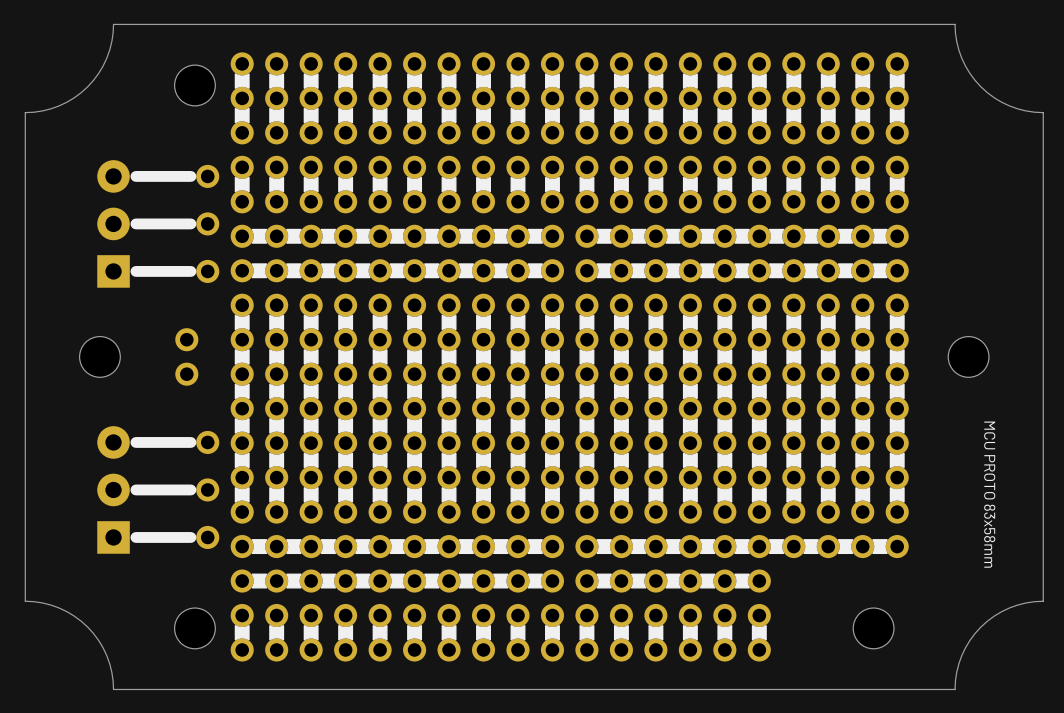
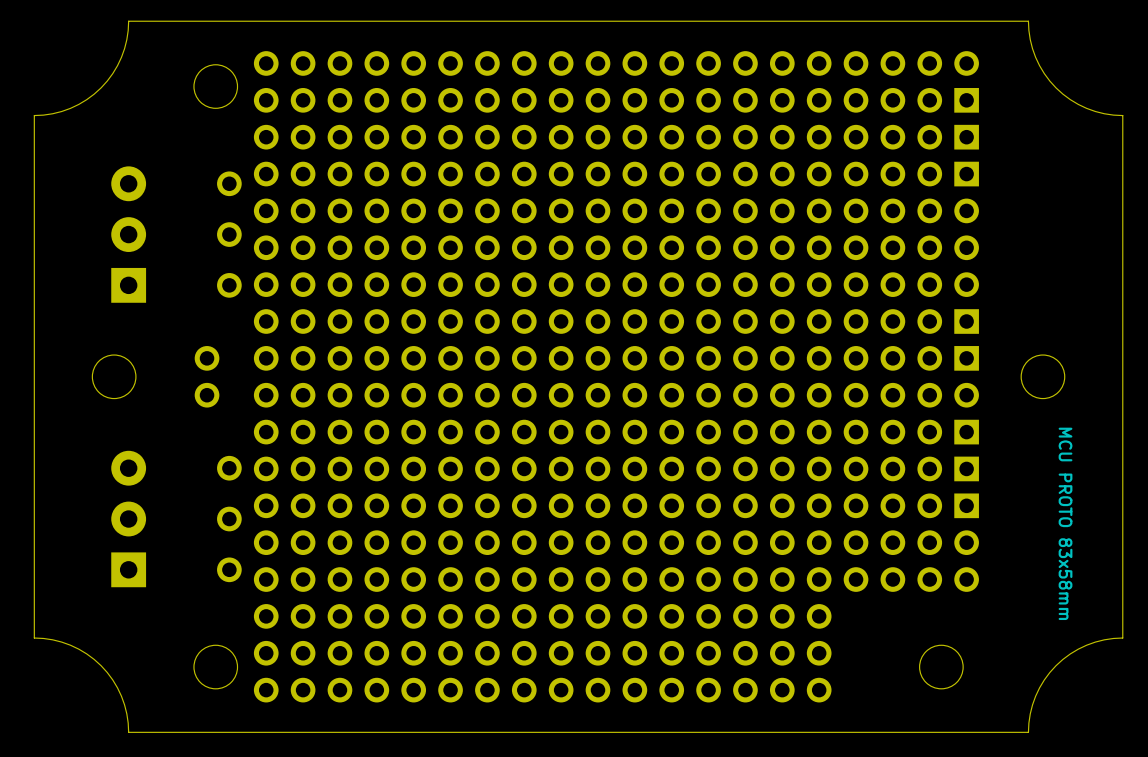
drawing: [234, 73, 250, 89] -> none
drawing: [269, 73, 285, 89] -> none
drawing: [303, 73, 319, 89] -> none
drawing: [338, 73, 354, 89] -> none
drawing: [372, 73, 388, 89] -> none
drawing: [407, 73, 423, 89] -> none
drawing: [441, 73, 457, 89] -> none
drawing: [476, 73, 491, 89] -> none
drawing: [510, 73, 526, 89] -> none
drawing: [545, 73, 560, 89] -> none
drawing: [579, 73, 595, 89] -> none
drawing: [613, 73, 629, 89] -> none
drawing: [648, 73, 664, 89] -> none
drawing: [682, 73, 698, 89] -> none
drawing: [717, 73, 733, 89] -> none
drawing: [751, 73, 767, 89] -> none
drawing: [786, 73, 802, 89] -> none
drawing: [820, 73, 836, 89] -> none
drawing: [855, 73, 871, 89] -> none
drawing: [889, 73, 905, 89] -> none
part: (242, 98) -> none
part: (276, 98) -> none
part: (311, 98) -> none
part: (345, 98) -> none
part: (380, 98) -> none
part: (414, 98) -> none
part: (449, 98) -> none
part: (483, 98) -> none
part: (518, 98) -> none
part: (552, 98) -> none
part: none -> (616, 100)
part: (586, 98) -> none
part: (621, 98) -> none
part: (655, 98) -> none
part: (690, 98) -> none
part: (724, 98) -> none
part: (759, 98) -> none
part: (793, 98) -> none
part: (828, 98) -> none
part: (862, 98) -> none
part: (897, 98) -> none
drawing: [234, 107, 250, 124] -> none
drawing: [269, 107, 285, 124] -> none
drawing: [303, 107, 319, 124] -> none
drawing: [338, 107, 354, 124] -> none
drawing: [372, 107, 388, 124] -> none
drawing: [407, 107, 423, 124] -> none
drawing: [441, 107, 457, 124] -> none
drawing: [476, 107, 491, 124] -> none
drawing: [510, 107, 526, 124] -> none
drawing: [545, 107, 560, 124] -> none
drawing: [579, 107, 595, 124] -> none
drawing: [613, 107, 629, 124] -> none
drawing: [648, 107, 664, 124] -> none
drawing: [682, 107, 698, 124] -> none
drawing: [717, 107, 733, 124] -> none
drawing: [751, 107, 767, 124] -> none
drawing: [786, 107, 802, 124] -> none
drawing: [820, 107, 836, 124] -> none
drawing: [855, 107, 871, 124] -> none
drawing: [889, 107, 905, 124] -> none
part: (242, 132) -> none
part: (276, 132) -> none
part: (311, 132) -> none
part: (345, 132) -> none
part: (380, 132) -> none
part: (414, 132) -> none
part: (449, 132) -> none
part: (483, 132) -> none
part: (518, 132) -> none
part: (552, 132) -> none
part: none -> (616, 137)
part: (586, 132) -> none
part: (621, 132) -> none
part: (655, 132) -> none
part: (690, 132) -> none
part: (724, 132) -> none
part: (759, 132) -> none
part: (793, 132) -> none
part: (828, 132) -> none
part: (862, 132) -> none
part: (897, 132) -> none
part: (242, 167) -> none
part: (276, 167) -> none
part: (311, 167) -> none
part: (345, 167) -> none
part: (380, 167) -> none
part: (414, 167) -> none
part: (449, 167) -> none
part: (483, 167) -> none
part: (518, 167) -> none
part: (552, 167) -> none
part: none -> (616, 174)
part: (586, 167) -> none
part: (621, 167) -> none
part: (655, 167) -> none
part: (690, 167) -> none
part: (724, 167) -> none
part: (759, 167) -> none
part: (793, 167) -> none
part: (828, 167) -> none
part: (862, 167) -> none
part: (897, 167) -> none
line: (190, 176) (135, 176) -> none
drawing: [234, 176, 250, 193] -> none
drawing: [269, 176, 285, 193] -> none
drawing: [303, 176, 319, 193] -> none
drawing: [338, 176, 354, 193] -> none
drawing: [372, 176, 388, 193] -> none
drawing: [407, 176, 423, 193] -> none
drawing: [441, 176, 457, 193] -> none
drawing: [476, 176, 491, 193] -> none
drawing: [510, 176, 526, 193] -> none
drawing: [545, 176, 560, 193] -> none
drawing: [579, 176, 595, 193] -> none
drawing: [613, 176, 629, 193] -> none
drawing: [648, 176, 664, 193] -> none
drawing: [682, 176, 698, 193] -> none
drawing: [717, 176, 733, 193] -> none
drawing: [751, 176, 767, 193] -> none
drawing: [786, 176, 802, 193] -> none
drawing: [820, 176, 836, 193] -> none
drawing: [855, 176, 871, 193] -> none
drawing: [889, 176, 905, 193] -> none
line: (190, 223) (135, 223) -> none
drawing: [251, 228, 268, 244] -> none
drawing: [286, 228, 302, 244] -> none
drawing: [320, 228, 337, 244] -> none
drawing: [355, 228, 371, 244] -> none
drawing: [389, 228, 406, 244] -> none
drawing: [424, 228, 440, 244] -> none
drawing: [458, 228, 475, 244] -> none
drawing: [493, 228, 509, 244] -> none
drawing: [527, 228, 543, 244] -> none
drawing: [596, 228, 612, 244] -> none
drawing: [630, 228, 647, 244] -> none
drawing: [665, 228, 681, 244] -> none
drawing: [699, 228, 716, 244] -> none
drawing: [734, 228, 750, 244] -> none
drawing: [768, 228, 785, 244] -> none
drawing: [803, 228, 819, 244] -> none
drawing: [837, 228, 854, 244] -> none
drawing: [872, 228, 888, 244] -> none
drawing: [251, 263, 268, 279] -> none
drawing: [286, 263, 302, 279] -> none
drawing: [320, 263, 337, 279] -> none
drawing: [355, 263, 371, 279] -> none
drawing: [389, 263, 406, 279] -> none
drawing: [424, 263, 440, 279] -> none
drawing: [458, 263, 475, 279] -> none
drawing: [493, 263, 509, 279] -> none
drawing: [527, 263, 543, 279] -> none
drawing: [596, 263, 612, 279] -> none
drawing: [630, 263, 647, 279] -> none
drawing: [665, 263, 681, 279] -> none
drawing: [699, 263, 716, 279] -> none
drawing: [734, 263, 750, 279] -> none
drawing: [768, 263, 785, 279] -> none
drawing: [803, 263, 819, 279] -> none
drawing: [837, 263, 854, 279] -> none
drawing: [872, 263, 888, 279] -> none
line: (190, 271) (135, 271) -> none
part: (242, 305) -> none
part: (276, 305) -> none
part: (311, 305) -> none
part: (345, 305) -> none
part: (380, 305) -> none
part: (414, 305) -> none
part: (449, 305) -> none
part: (483, 305) -> none
part: (518, 305) -> none
part: (552, 305) -> none
part: none -> (616, 321)
part: (586, 305) -> none
part: (621, 305) -> none
part: (655, 305) -> none
part: (690, 305) -> none
part: (724, 305) -> none
part: (759, 305) -> none
part: (793, 305) -> none
part: (828, 305) -> none
part: (862, 305) -> none
part: (897, 305) -> none
drawing: [234, 314, 250, 331] -> none
drawing: [269, 314, 285, 331] -> none
drawing: [303, 314, 319, 331] -> none
drawing: [338, 314, 354, 331] -> none
drawing: [372, 314, 388, 331] -> none
drawing: [407, 314, 423, 331] -> none
drawing: [441, 314, 457, 331] -> none
drawing: [476, 314, 491, 331] -> none
drawing: [510, 314, 526, 331] -> none
drawing: [545, 314, 560, 331] -> none
drawing: [579, 314, 595, 331] -> none
drawing: [613, 314, 629, 331] -> none
drawing: [648, 314, 664, 331] -> none
drawing: [682, 314, 698, 331] -> none
drawing: [717, 314, 733, 331] -> none
drawing: [751, 314, 767, 331] -> none
drawing: [786, 314, 802, 331] -> none
drawing: [820, 314, 836, 331] -> none
drawing: [855, 314, 871, 331] -> none
drawing: [889, 314, 905, 331] -> none
part: (242, 339) -> none
part: (276, 339) -> none
part: (311, 339) -> none
part: (345, 339) -> none
part: (380, 339) -> none
part: (414, 339) -> none
part: (449, 339) -> none
part: (483, 339) -> none
part: (518, 339) -> none
part: (552, 339) -> none
part: none -> (616, 358)
part: (586, 339) -> none
part: (621, 339) -> none
part: (655, 339) -> none
part: (690, 339) -> none
part: (724, 339) -> none
part: (759, 339) -> none
part: (793, 339) -> none
part: (828, 339) -> none
part: (862, 339) -> none
part: (897, 339) -> none
drawing: [234, 349, 250, 365] -> none
drawing: [269, 349, 285, 365] -> none
drawing: [303, 349, 319, 365] -> none
drawing: [338, 349, 354, 365] -> none
drawing: [372, 349, 388, 365] -> none
drawing: [407, 349, 423, 365] -> none
drawing: [441, 349, 457, 365] -> none
drawing: [476, 349, 491, 365] -> none
drawing: [510, 349, 526, 365] -> none
drawing: [545, 349, 560, 365] -> none
drawing: [579, 349, 595, 365] -> none
drawing: [613, 349, 629, 365] -> none
drawing: [648, 349, 664, 365] -> none
drawing: [682, 349, 698, 365] -> none
drawing: [717, 349, 733, 365] -> none
drawing: [751, 349, 767, 365] -> none
drawing: [786, 349, 802, 365] -> none
drawing: [820, 349, 836, 365] -> none
drawing: [855, 349, 871, 365] -> none
drawing: [889, 349, 905, 365] -> none
drawing: [234, 383, 250, 400] -> none
drawing: [269, 383, 285, 400] -> none
drawing: [303, 383, 319, 400] -> none
drawing: [338, 383, 354, 400] -> none
drawing: [372, 383, 388, 400] -> none
drawing: [407, 383, 423, 400] -> none
drawing: [441, 383, 457, 400] -> none
drawing: [476, 383, 491, 400] -> none
drawing: [510, 383, 526, 400] -> none
drawing: [545, 383, 560, 400] -> none
drawing: [579, 383, 595, 400] -> none
drawing: [613, 383, 629, 400] -> none
drawing: [648, 383, 664, 400] -> none
drawing: [682, 383, 698, 400] -> none
drawing: [717, 383, 733, 400] -> none
drawing: [751, 383, 767, 400] -> none
drawing: [786, 383, 802, 400] -> none
drawing: [820, 383, 836, 400] -> none
drawing: [855, 383, 871, 400] -> none
drawing: [889, 383, 905, 400] -> none
part: (242, 408) -> none
part: (276, 408) -> none
part: (311, 408) -> none
part: (345, 408) -> none
part: (380, 408) -> none
part: (414, 408) -> none
part: (449, 408) -> none
part: (483, 408) -> none
part: (518, 408) -> none
part: (552, 408) -> none
part: none -> (616, 432)
part: (586, 408) -> none
part: (621, 408) -> none
part: (655, 408) -> none
part: (690, 408) -> none
part: (724, 408) -> none
part: (759, 408) -> none
part: (793, 408) -> none
part: (828, 408) -> none
part: (862, 408) -> none
part: (897, 408) -> none
drawing: [234, 418, 250, 434] -> none
drawing: [269, 418, 285, 434] -> none
drawing: [303, 418, 319, 434] -> none
drawing: [338, 418, 354, 434] -> none
drawing: [372, 418, 388, 434] -> none
drawing: [407, 418, 423, 434] -> none
drawing: [441, 418, 457, 434] -> none
drawing: [476, 418, 491, 434] -> none
drawing: [510, 418, 526, 434] -> none
drawing: [545, 418, 560, 434] -> none
drawing: [579, 418, 595, 434] -> none
drawing: [613, 418, 629, 434] -> none
drawing: [648, 418, 664, 434] -> none
drawing: [682, 418, 698, 434] -> none
drawing: [717, 418, 733, 434] -> none
drawing: [751, 418, 767, 434] -> none
drawing: [786, 418, 802, 434] -> none
drawing: [820, 418, 836, 434] -> none
drawing: [855, 418, 871, 434] -> none
drawing: [889, 418, 905, 434] -> none
line: (190, 442) (135, 442) -> none
part: (242, 443) -> none
part: (276, 443) -> none
part: (311, 443) -> none
part: (345, 443) -> none
part: (380, 443) -> none
part: (414, 443) -> none
part: (449, 443) -> none
part: (483, 443) -> none
part: (518, 443) -> none
part: (552, 443) -> none
part: none -> (616, 468)
part: (586, 443) -> none
part: (621, 443) -> none
part: (655, 443) -> none
part: (690, 443) -> none
part: (724, 443) -> none
part: (759, 443) -> none
part: (793, 443) -> none
part: (828, 443) -> none
part: (862, 443) -> none
part: (897, 443) -> none
drawing: [234, 452, 250, 469] -> none
drawing: [269, 452, 285, 469] -> none
drawing: [303, 452, 319, 469] -> none
drawing: [338, 452, 354, 469] -> none
drawing: [372, 452, 388, 469] -> none
drawing: [407, 452, 423, 469] -> none
drawing: [441, 452, 457, 469] -> none
drawing: [476, 452, 491, 469] -> none
drawing: [510, 452, 526, 469] -> none
drawing: [545, 452, 560, 469] -> none
drawing: [579, 452, 595, 469] -> none
drawing: [613, 452, 629, 469] -> none
drawing: [648, 452, 664, 469] -> none
drawing: [682, 452, 698, 469] -> none
drawing: [717, 452, 733, 469] -> none
drawing: [751, 452, 767, 469] -> none
drawing: [786, 452, 802, 469] -> none
drawing: [820, 452, 836, 469] -> none
drawing: [855, 452, 871, 469] -> none
drawing: [889, 452, 905, 469] -> none
part: (242, 477) -> none
part: (276, 477) -> none
part: (311, 477) -> none
part: (345, 477) -> none
part: (380, 477) -> none
part: (414, 477) -> none
part: (449, 477) -> none
part: (483, 477) -> none
part: (518, 477) -> none
part: (552, 477) -> none
part: none -> (616, 505)
part: (586, 477) -> none
part: (621, 477) -> none
part: (655, 477) -> none
part: (690, 477) -> none
part: (724, 477) -> none
part: (759, 477) -> none
part: (793, 477) -> none
part: (828, 477) -> none
part: (862, 477) -> none
part: (897, 477) -> none
drawing: [234, 487, 250, 503] -> none
drawing: [269, 487, 285, 503] -> none
drawing: [303, 487, 319, 503] -> none
drawing: [338, 487, 354, 503] -> none
drawing: [372, 487, 388, 503] -> none
drawing: [407, 487, 423, 503] -> none
drawing: [441, 487, 457, 503] -> none
drawing: [476, 487, 491, 503] -> none
drawing: [510, 487, 526, 503] -> none
drawing: [545, 487, 560, 503] -> none
drawing: [579, 487, 595, 503] -> none
drawing: [613, 487, 629, 503] -> none
drawing: [648, 487, 664, 503] -> none
drawing: [682, 487, 698, 503] -> none
drawing: [717, 487, 733, 503] -> none
drawing: [751, 487, 767, 503] -> none
drawing: [786, 487, 802, 503] -> none
drawing: [820, 487, 836, 503] -> none
drawing: [855, 487, 871, 503] -> none
drawing: [889, 487, 905, 503] -> none
line: (190, 489) (135, 489) -> none
line: (190, 537) (135, 537) -> none
drawing: [251, 539, 268, 555] -> none
drawing: [286, 539, 302, 555] -> none
drawing: [320, 539, 337, 555] -> none
drawing: [355, 539, 371, 555] -> none
drawing: [389, 539, 406, 555] -> none
drawing: [424, 539, 440, 555] -> none
drawing: [458, 539, 475, 555] -> none
drawing: [493, 539, 509, 555] -> none
drawing: [527, 539, 543, 555] -> none
drawing: [596, 539, 612, 555] -> none
drawing: [630, 539, 647, 555] -> none
drawing: [665, 539, 681, 555] -> none
drawing: [699, 539, 716, 555] -> none
drawing: [734, 539, 750, 555] -> none
drawing: [768, 539, 785, 555] -> none
drawing: [803, 539, 819, 555] -> none
drawing: [837, 539, 854, 555] -> none
drawing: [872, 539, 888, 555] -> none
drawing: [251, 573, 268, 589] -> none
drawing: [286, 573, 302, 589] -> none
drawing: [320, 573, 337, 589] -> none
drawing: [355, 573, 371, 589] -> none
drawing: [389, 573, 406, 589] -> none
drawing: [424, 573, 440, 589] -> none
drawing: [458, 573, 475, 589] -> none
drawing: [493, 573, 509, 589] -> none
drawing: [527, 573, 543, 589] -> none
drawing: [596, 573, 612, 589] -> none
drawing: [630, 573, 647, 589] -> none
drawing: [665, 573, 681, 589] -> none
drawing: [699, 573, 716, 589] -> none
drawing: [734, 573, 750, 589] -> none
drawing: [234, 625, 250, 641] -> none
drawing: [269, 625, 285, 641] -> none
drawing: [303, 625, 319, 641] -> none
drawing: [338, 625, 354, 641] -> none
drawing: [372, 625, 388, 641] -> none
drawing: [407, 625, 423, 641] -> none
drawing: [441, 625, 457, 641] -> none
drawing: [476, 625, 491, 641] -> none
drawing: [510, 625, 526, 641] -> none
drawing: [545, 625, 560, 641] -> none
drawing: [579, 625, 595, 641] -> none
drawing: [613, 625, 629, 641] -> none
drawing: [648, 625, 664, 641] -> none
drawing: [682, 625, 698, 641] -> none
drawing: [717, 625, 733, 641] -> none
drawing: [751, 625, 767, 641] -> none

